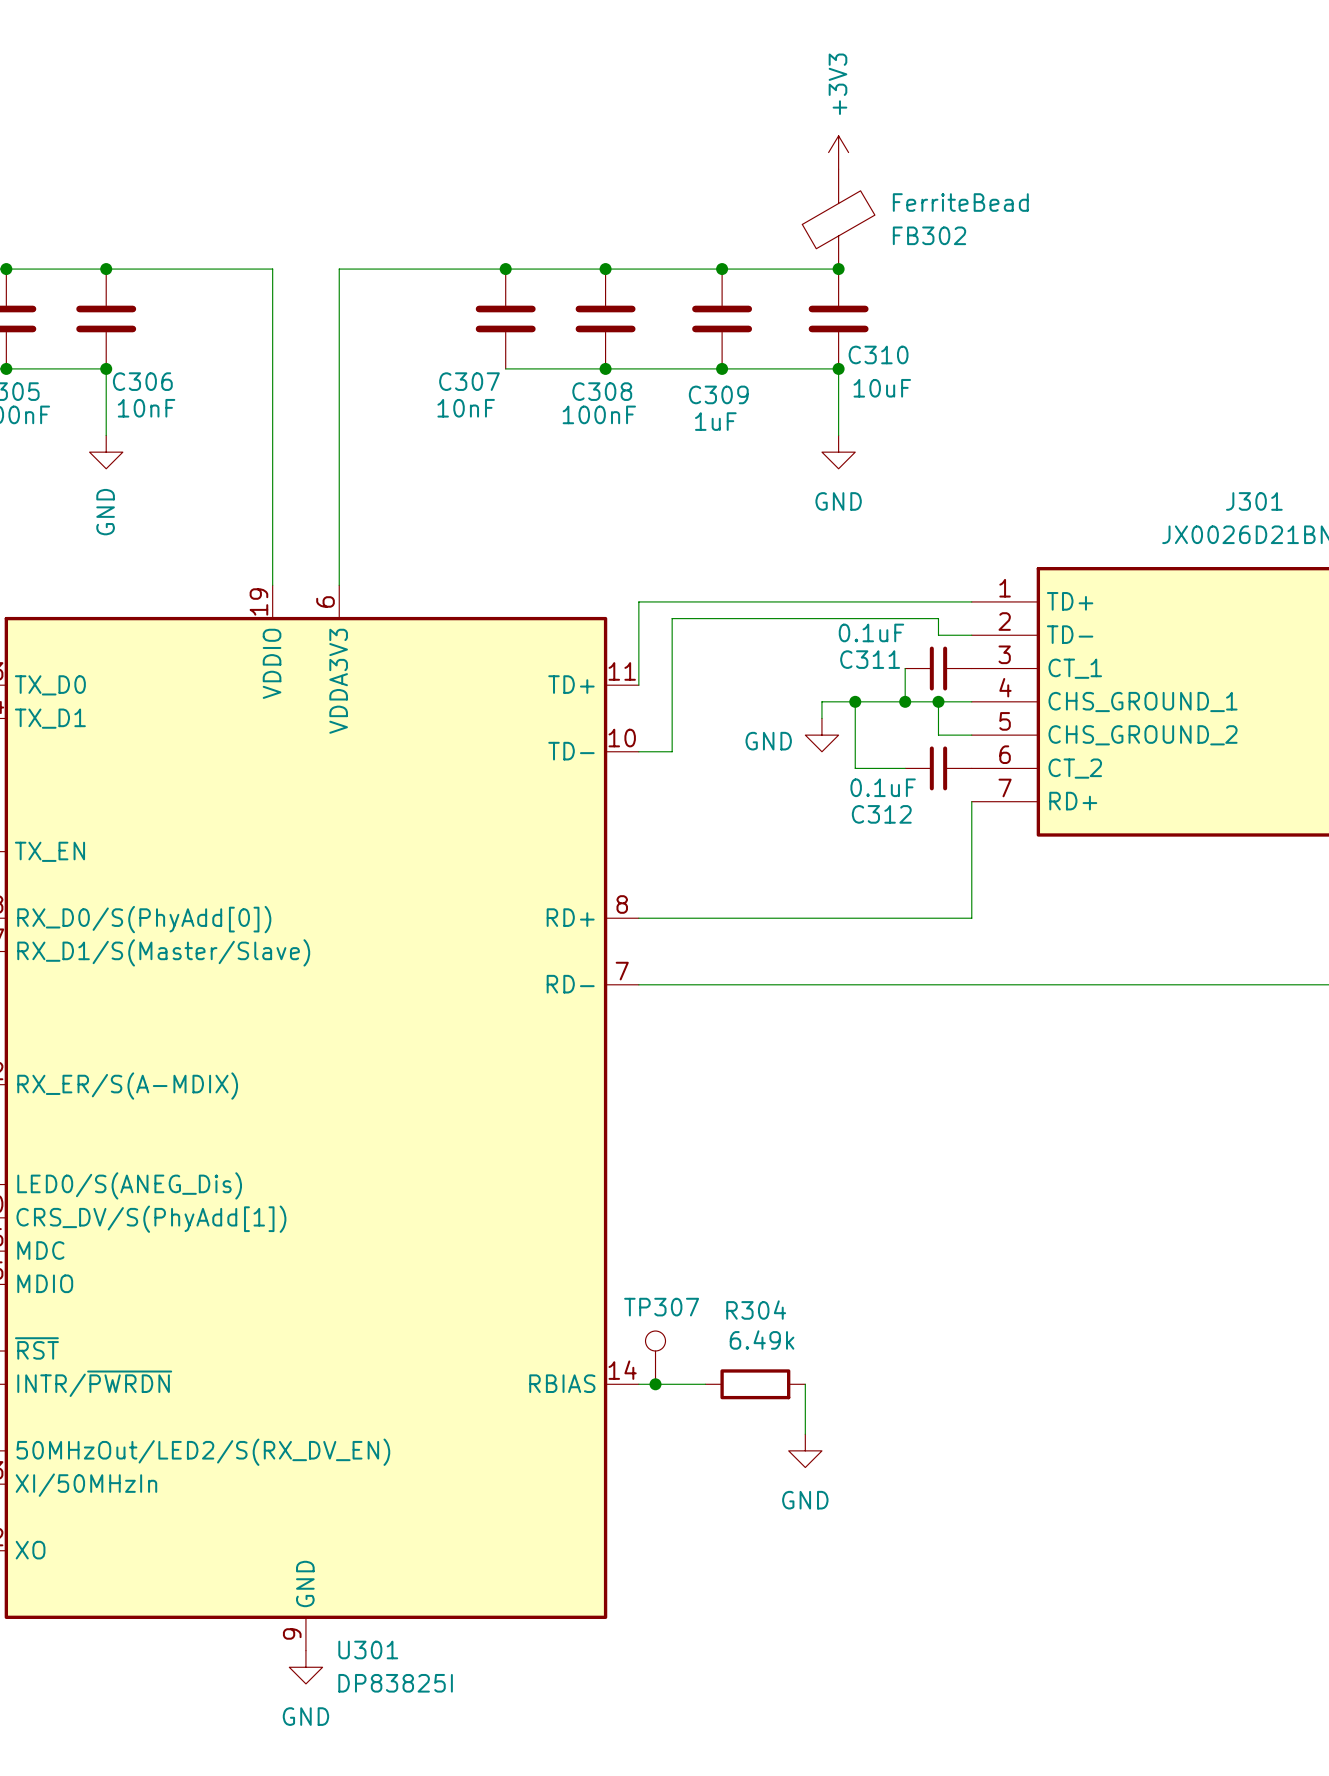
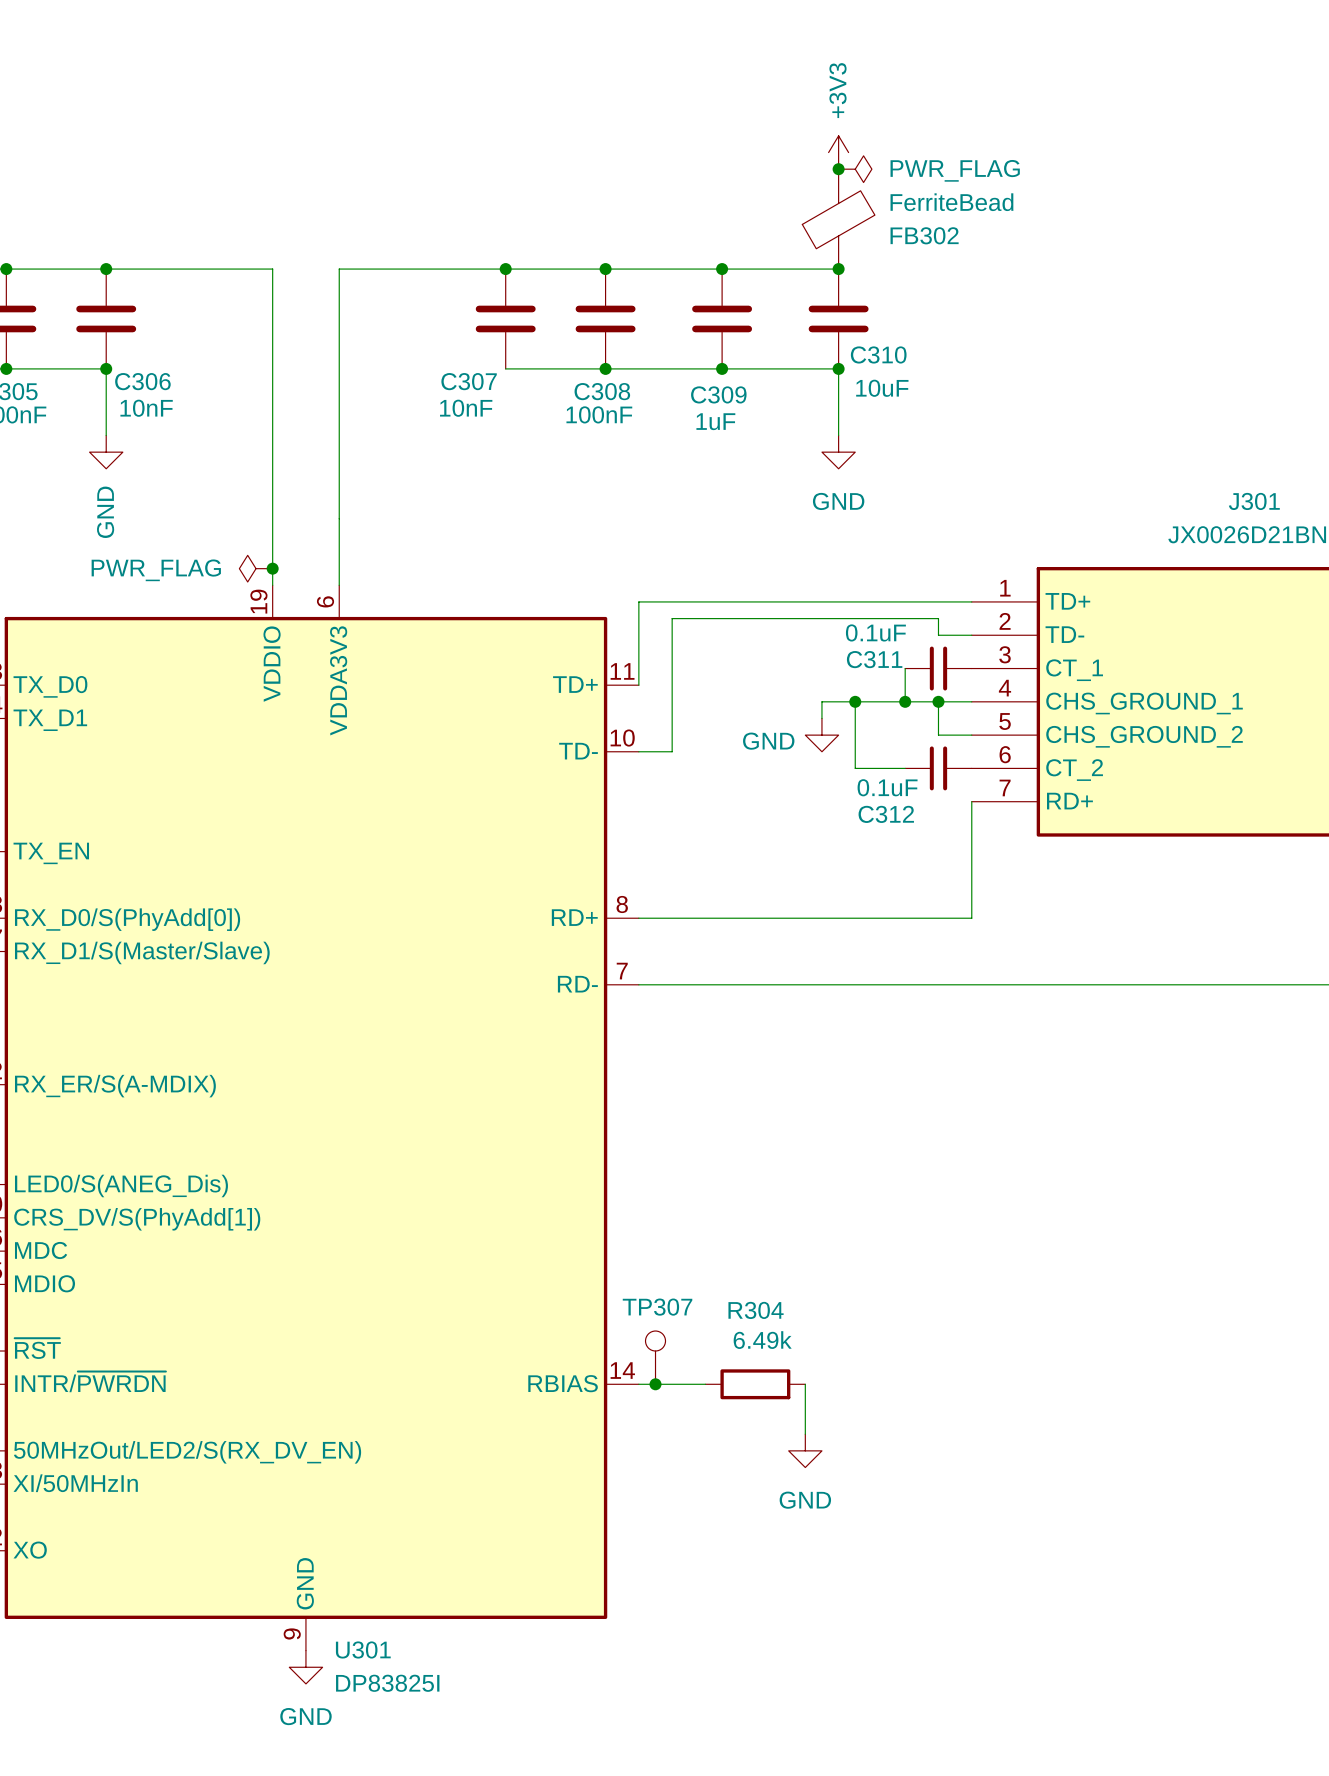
junction: none -> (838, 169)
power symbol: none -> PWR_FLAG (855, 169)
power symbol: none -> PWR_FLAG (256, 568)
junction: none -> (272, 568)

